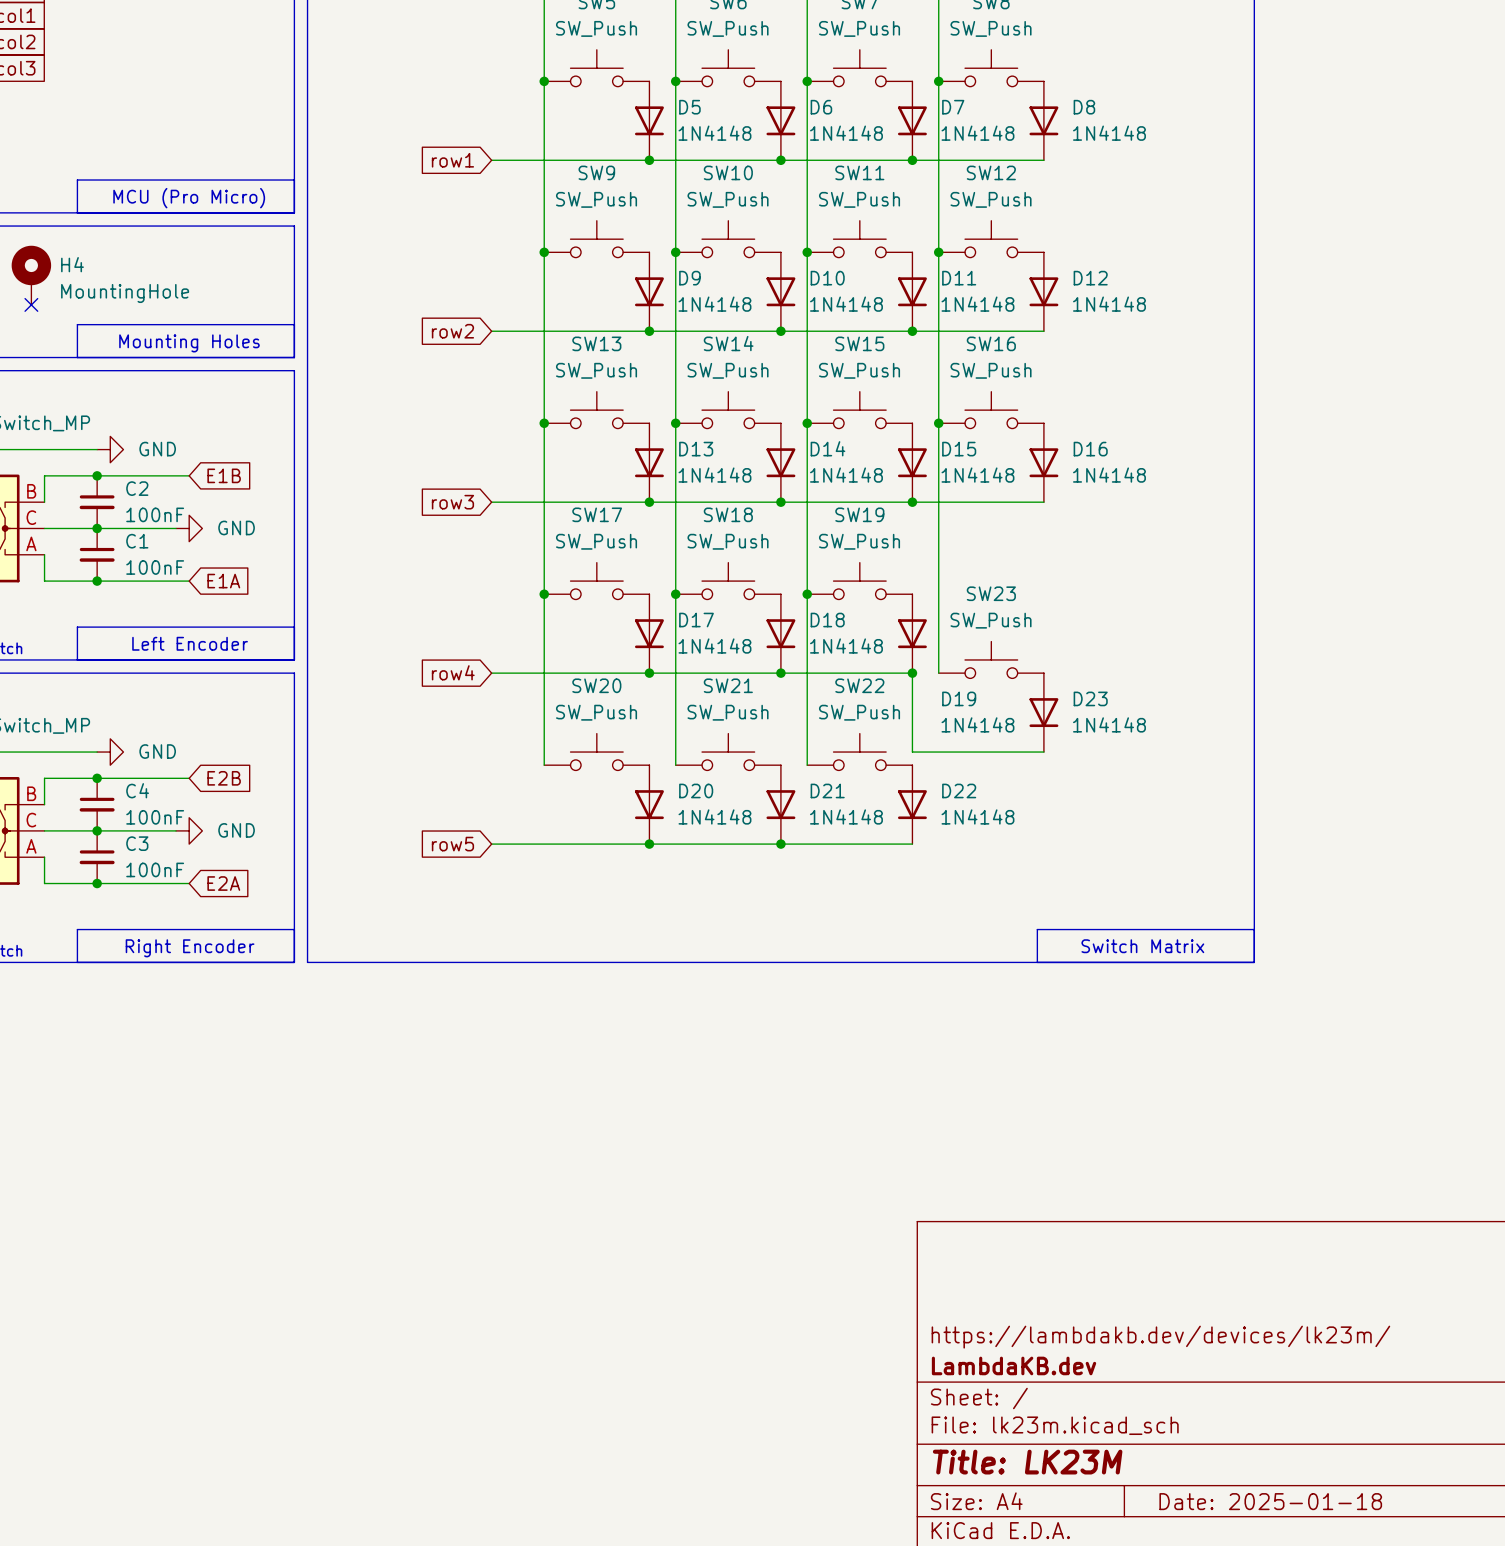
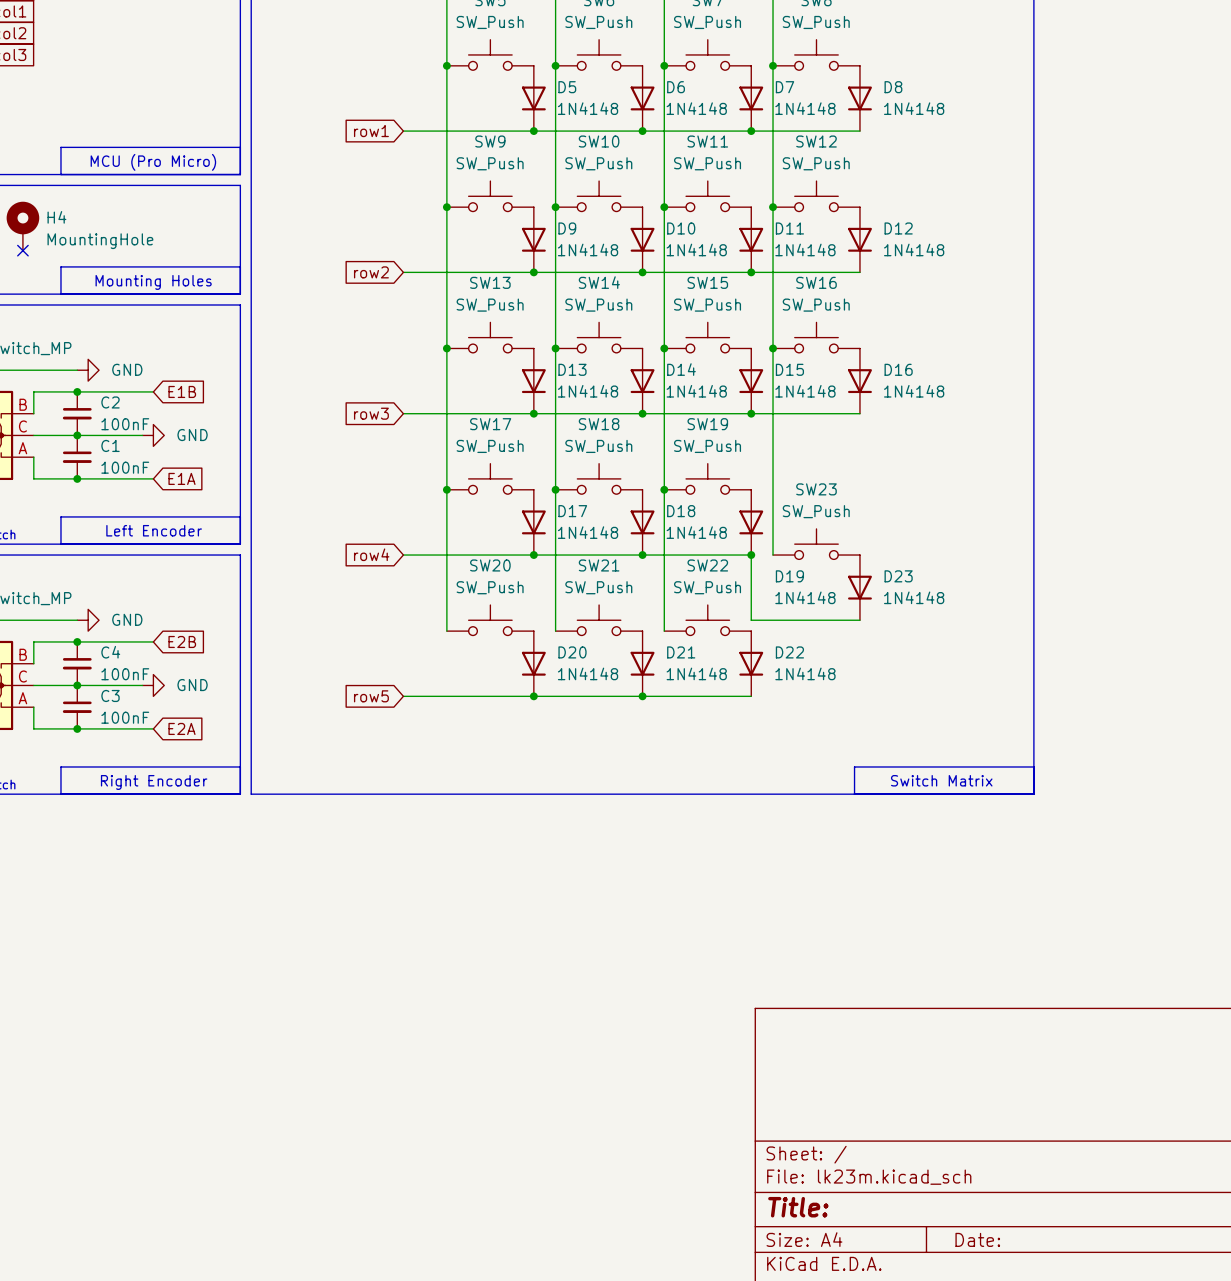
title block: https://lambdakb.dev/devices/lk23m/ (1160, 1337) -> none
title block: LambdaKB.dev (1014, 1365) -> none
title block: Title: LK23M (1027, 1462) -> Title: (798, 1207)
title block: Date: 2025-01-18 (1270, 1501) -> Date: (977, 1239)

